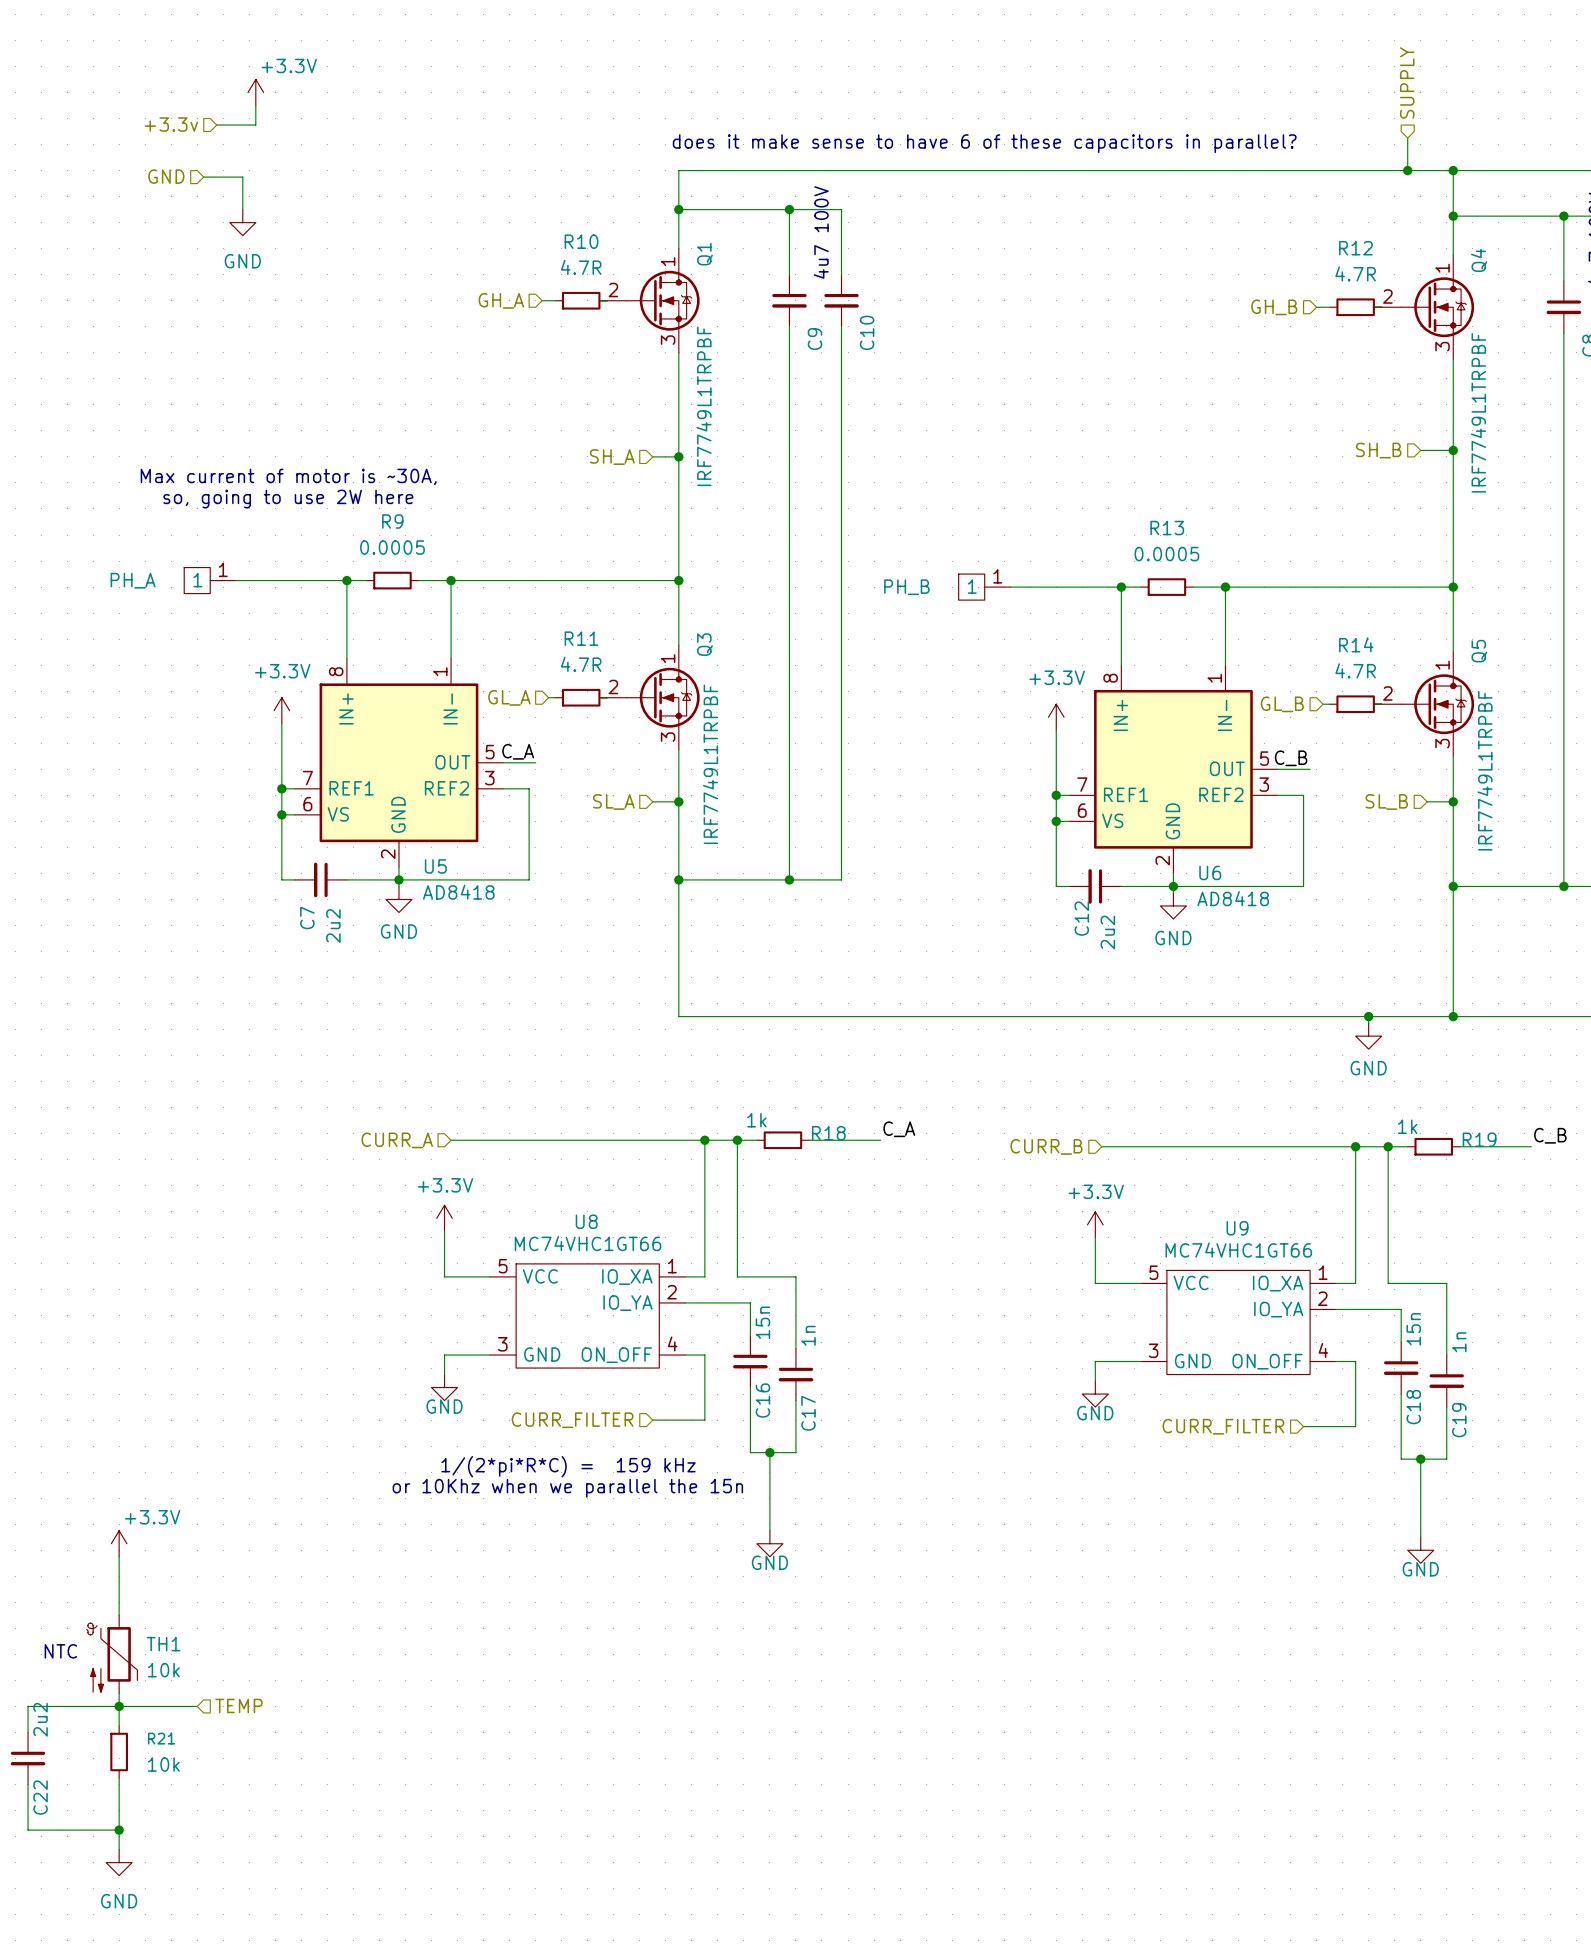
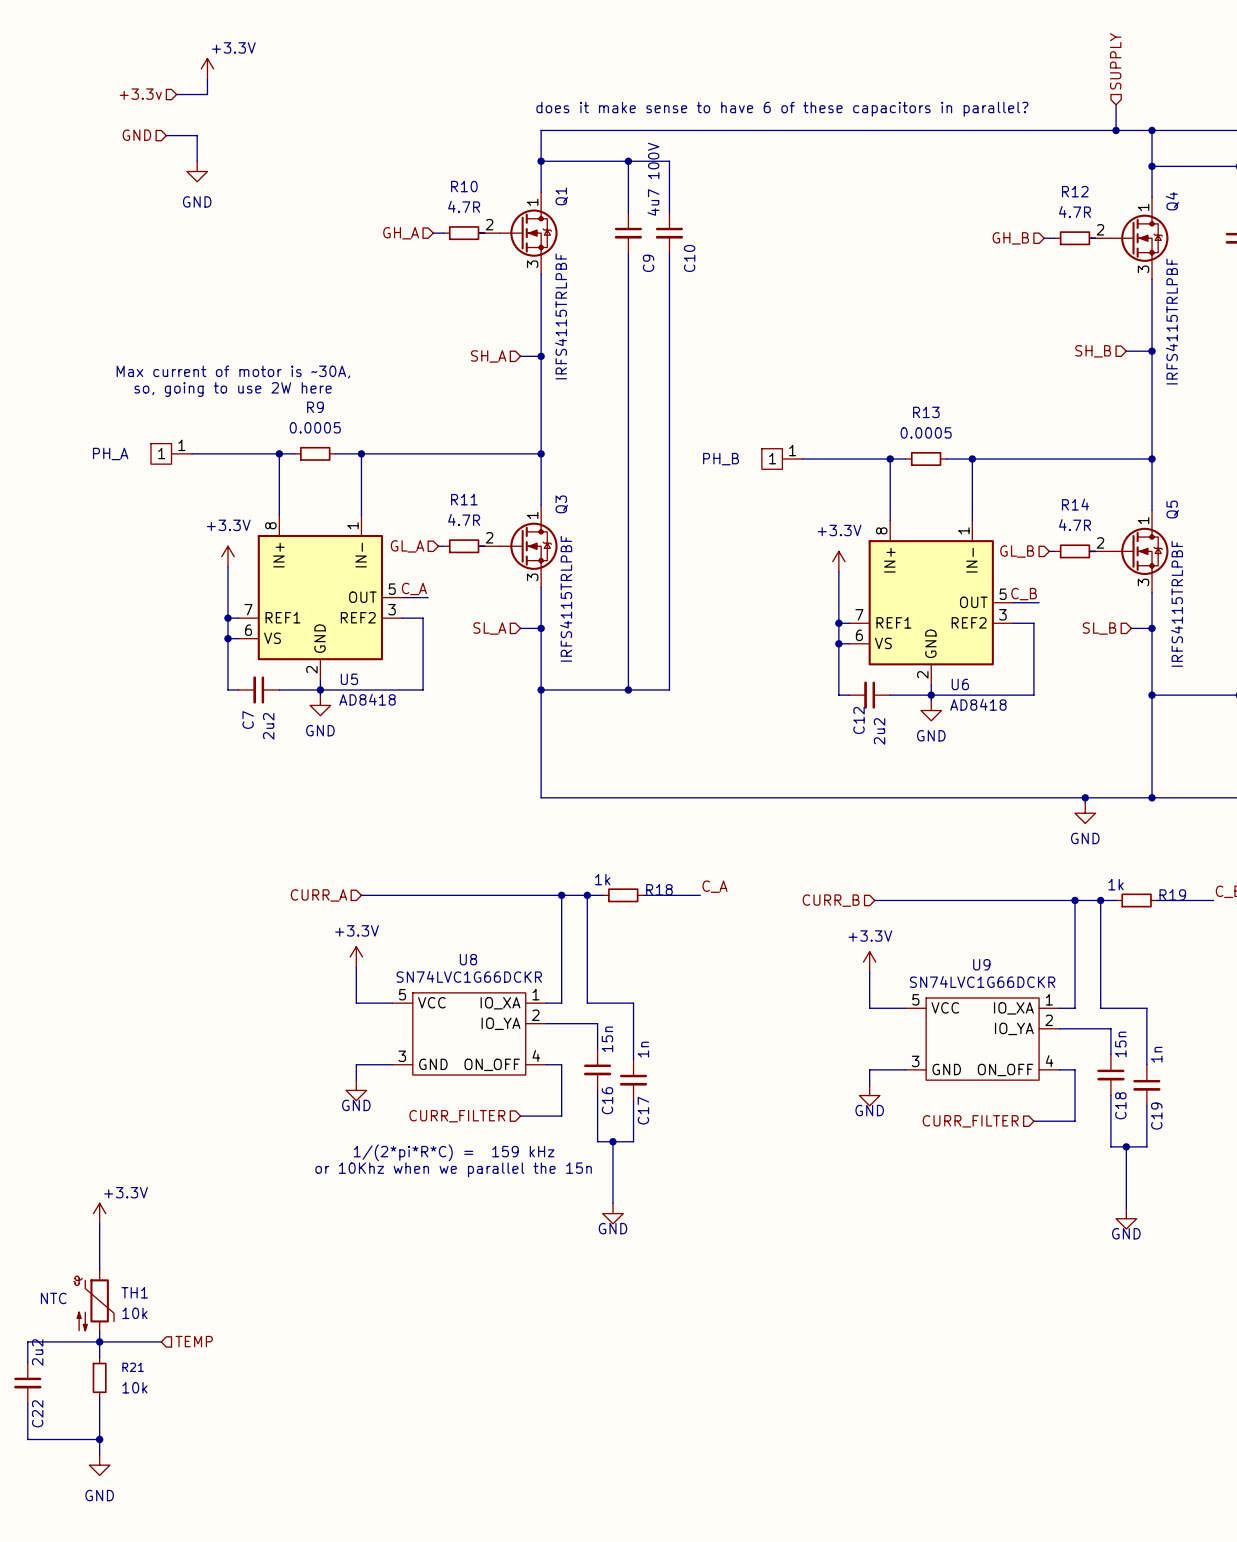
Q1 value: IRF7749L1TRPBF (704, 406) -> IRFS4115TRLPBF (561, 316)
Q4 value: IRF7749L1TRPBF (1478, 412) -> IRFS4115TRLPBF (1171, 321)
Q3 value: IRF7749L1TRPBF (710, 764) -> IRFS4115TRLPBF (566, 598)
Q5 value: IRF7749L1TRPBF (1485, 770) -> IRFS4115TRLPBF (1177, 603)
U8 value: MC74VHC1GT66 (588, 1243) -> SN74LVC1G66DCKR (469, 976)
U9 value: MC74VHC1GT66 (1238, 1250) -> SN74LVC1G66DCKR (982, 981)

